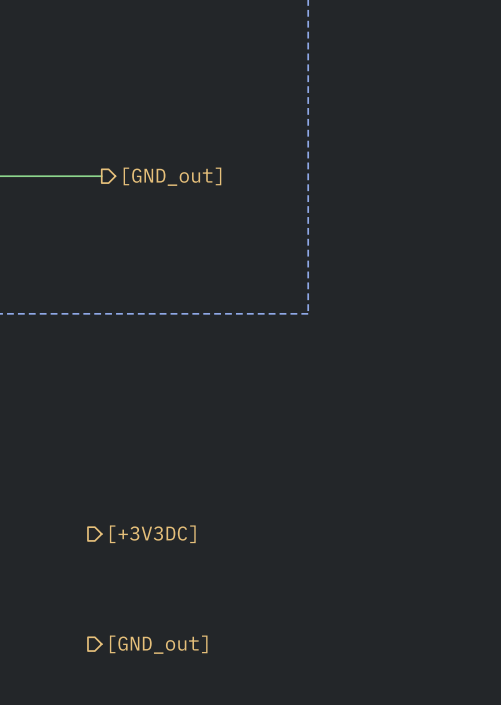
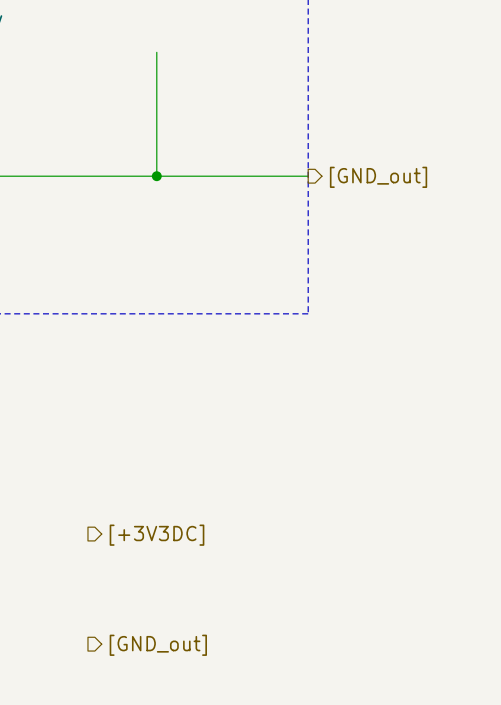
wire: none -> (156, 52) (156, 176)
wire: none -> (101, 176) (308, 176)
junction: none -> (156, 176)
hierarchical label position: [GND_out] (172, 176) -> [GND_out] (378, 177)

